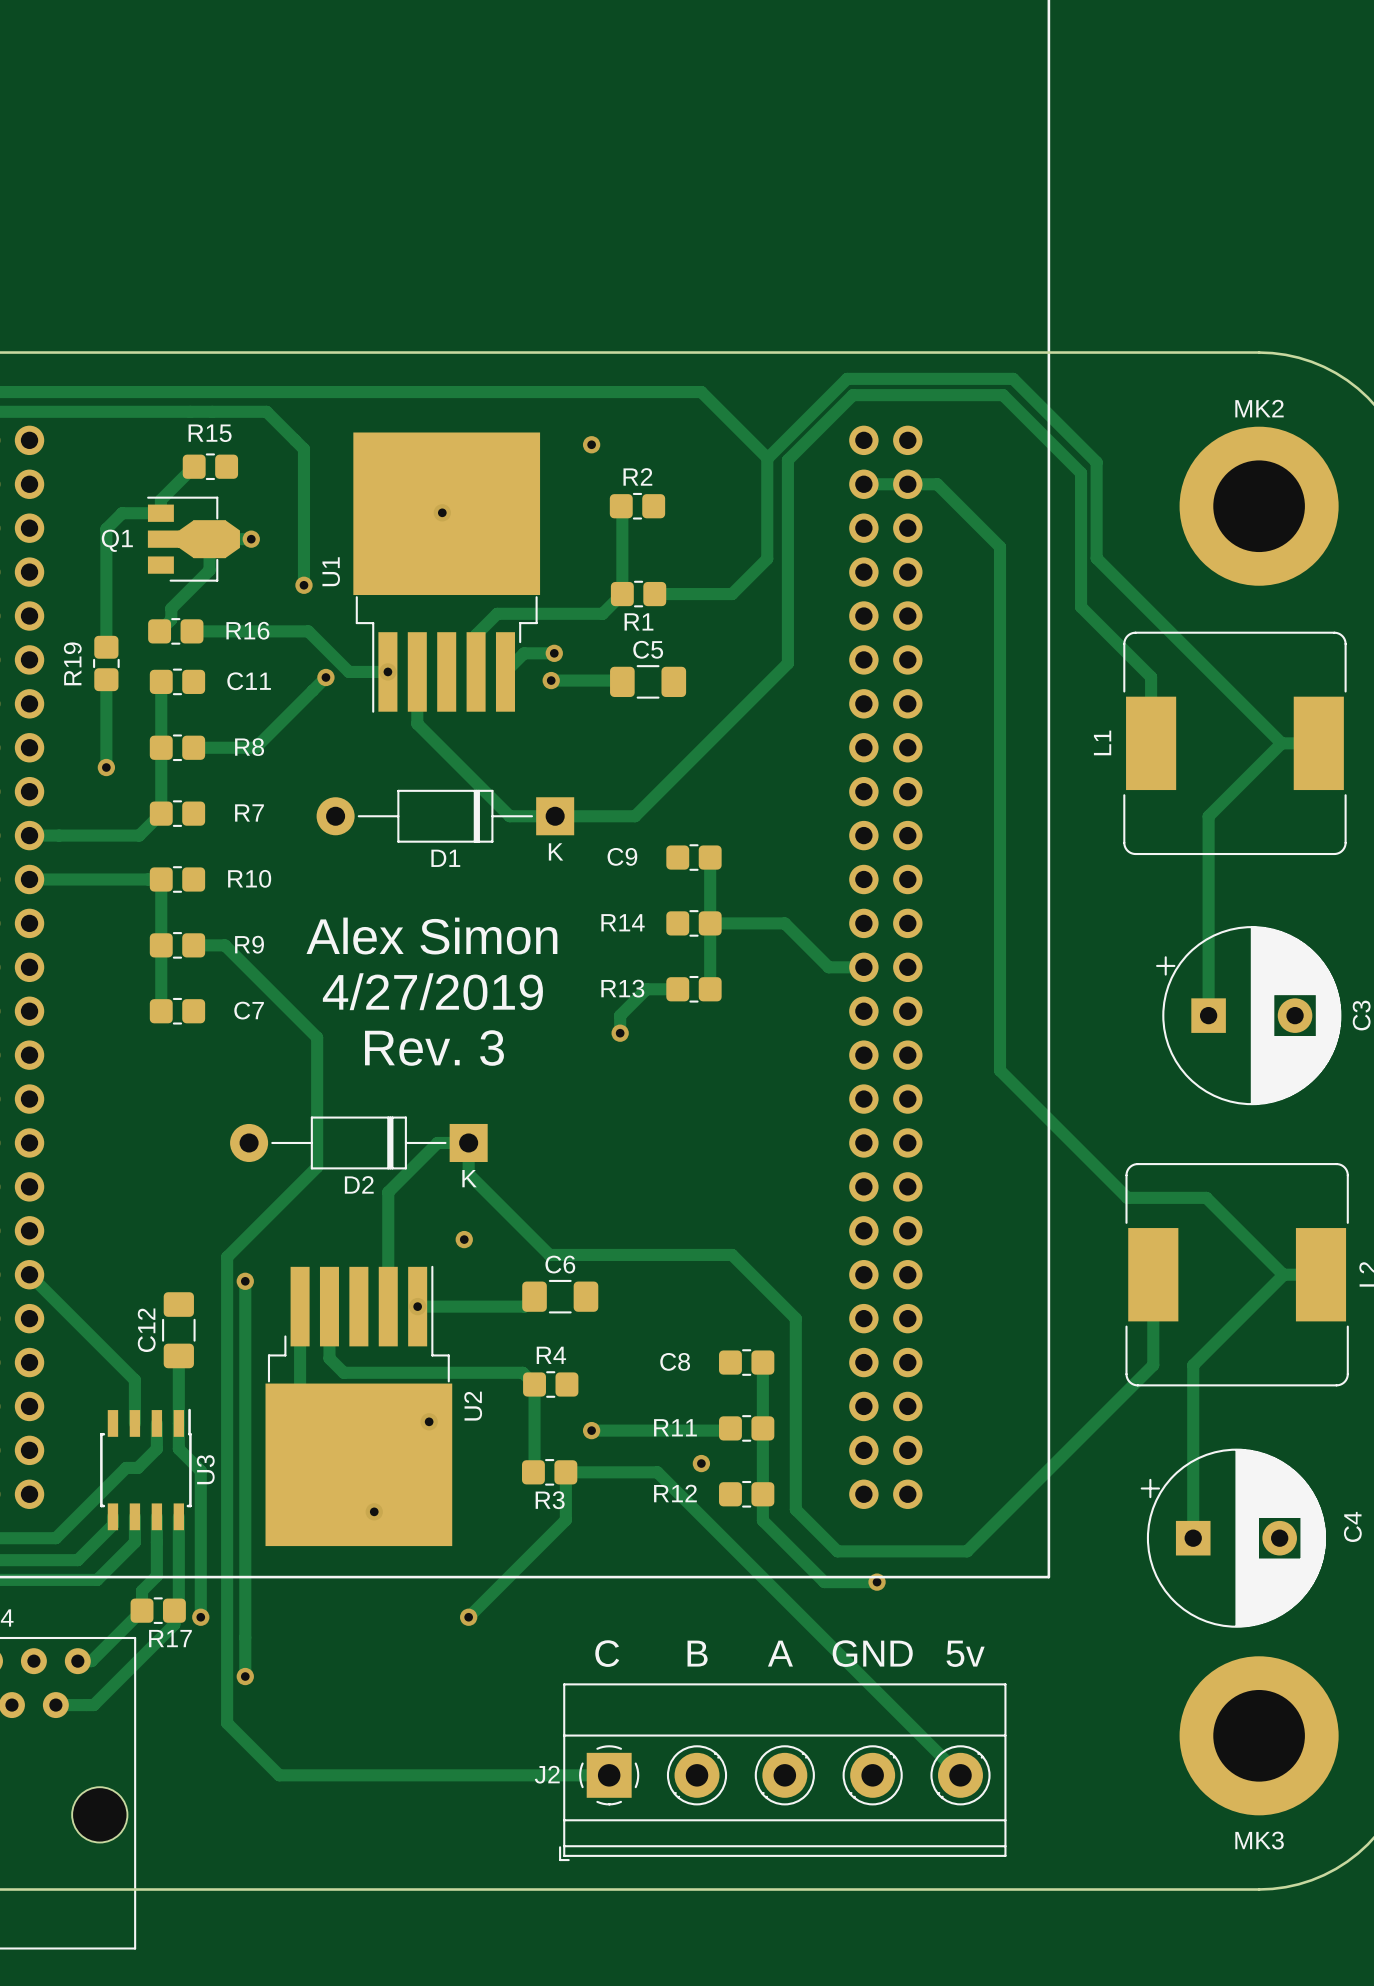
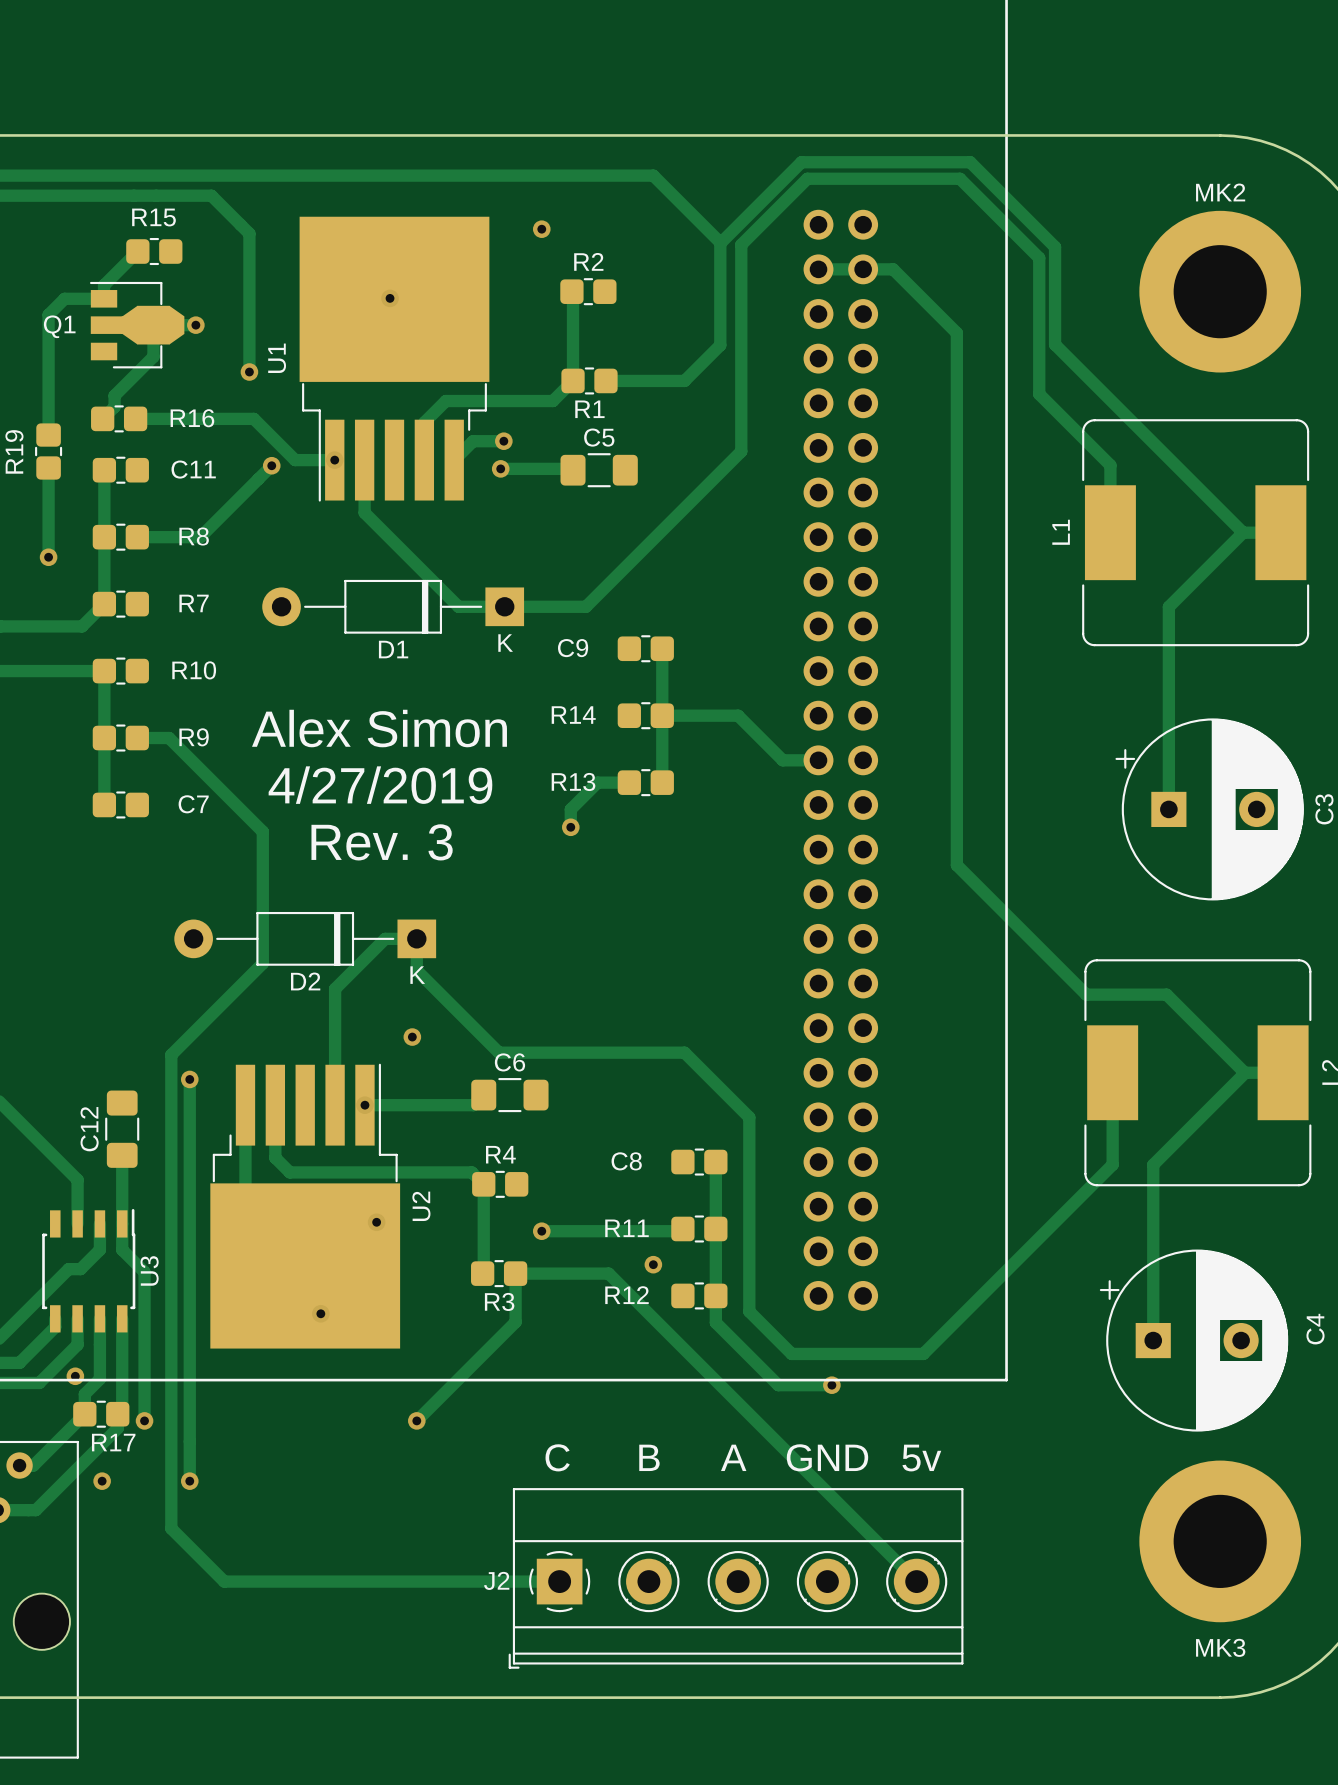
via: none -> (75, 1376)
via: none -> (102, 1481)

